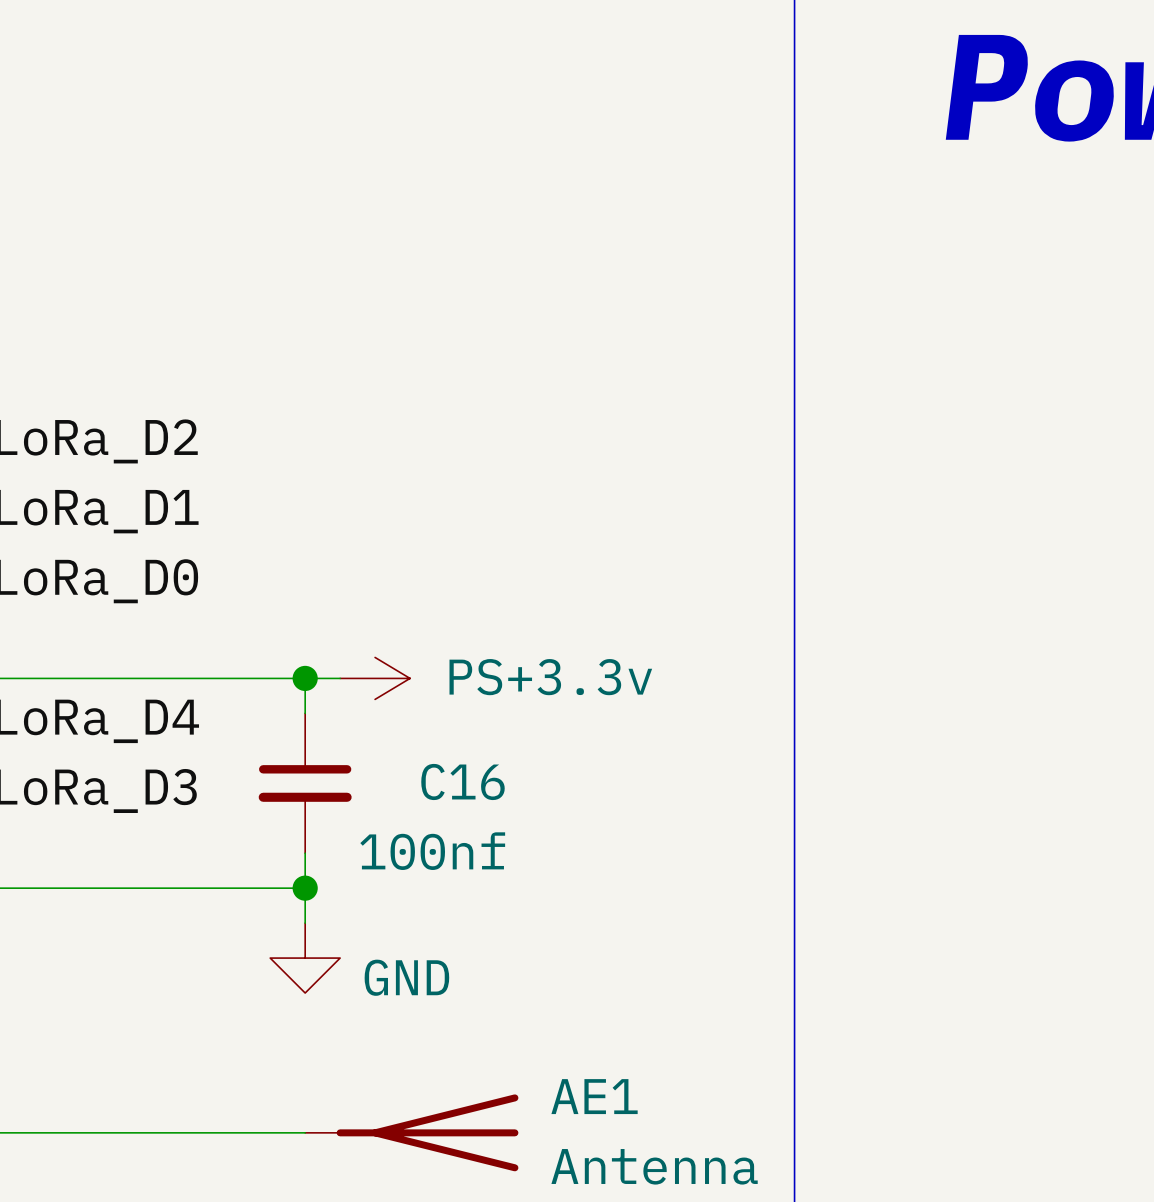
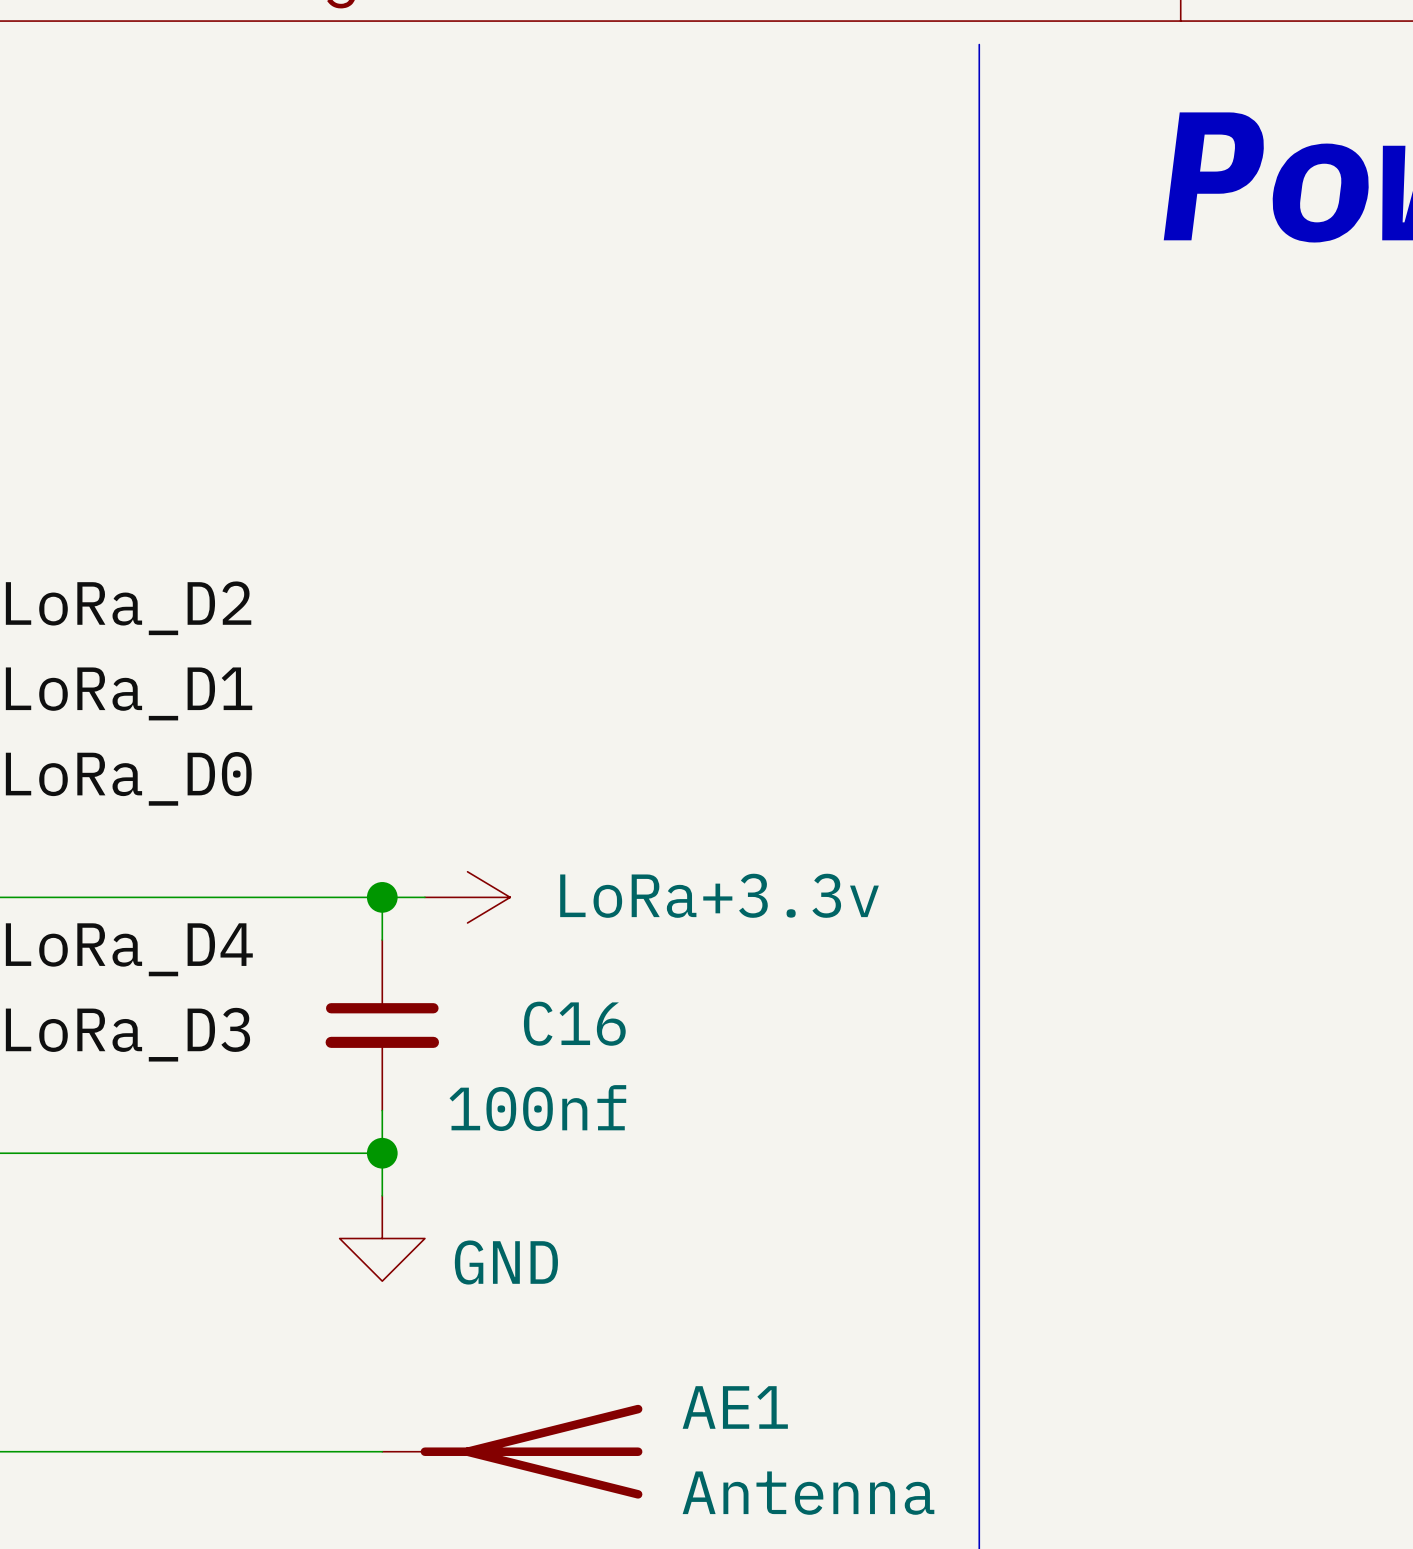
power symbol: PS+3.3v (375, 678) -> LoRa+3.3v (467, 897)

